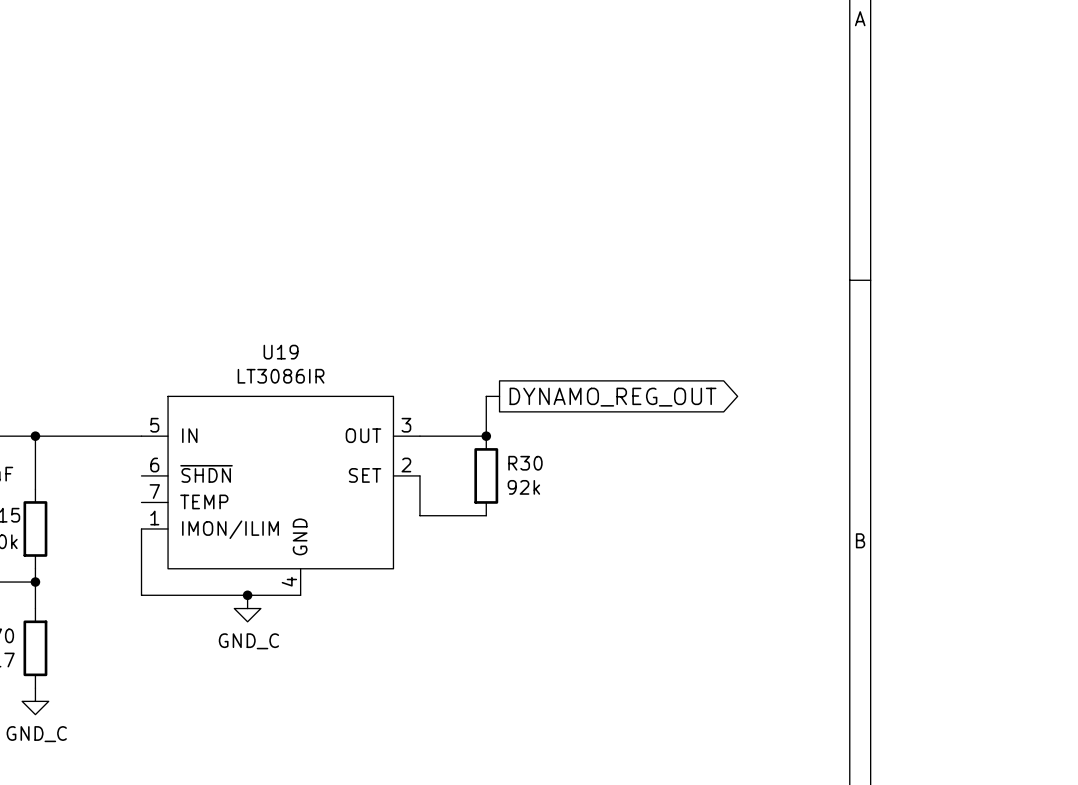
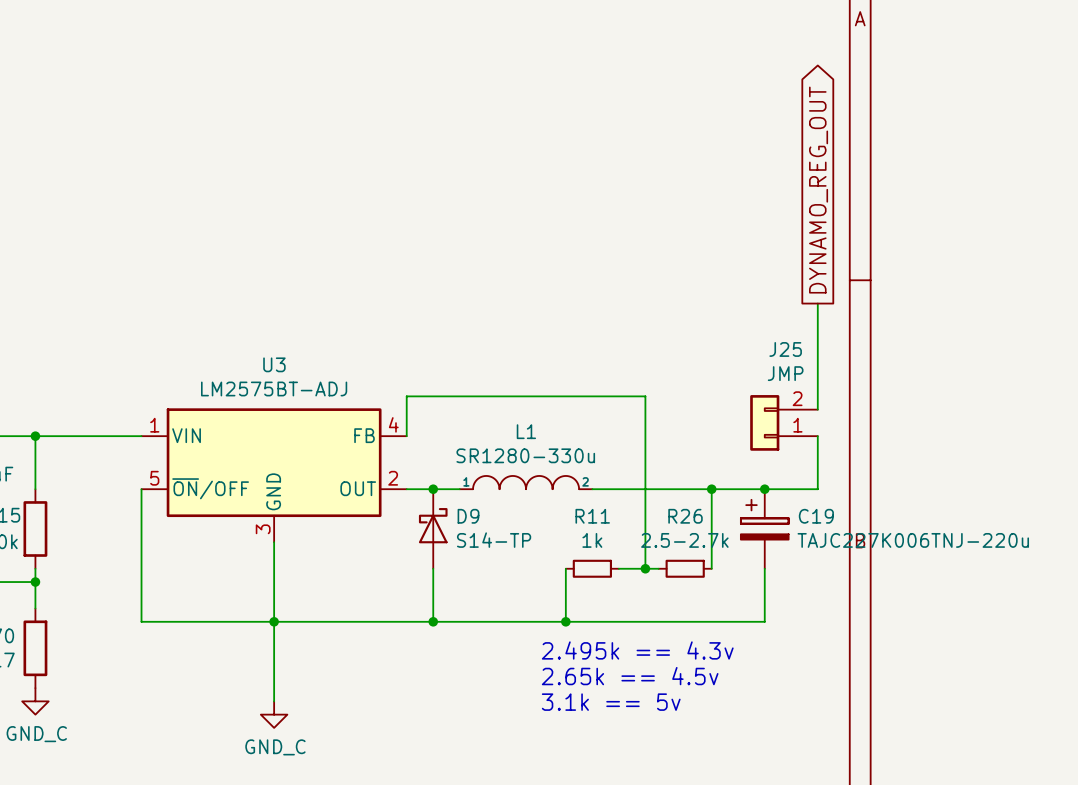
global label: none -> DYNAMO_REG_OUT (818, 190)
wire: none -> (817, 303) (817, 409)
wire: (486, 396) (486, 436) (419, 436) -> (486, 396) (406, 396) (406, 436)
wire: none -> (499, 396) (645, 396) (645, 568)
global label: DYNAMO_REG_OUT (613, 397) -> none
J25: none -> JMP (783, 422)
junction: (486, 436) -> none
wire: none -> (817, 436) (817, 489) (592, 489)
U3: none -> LM2575BT-ADJ (274, 475)
wire: (419, 475) (419, 515) (486, 515) -> none
R30: 92k (486, 475) -> none
L1: none -> SR1280-330u (526, 482)
wire: none -> (141, 489) (141, 528)
wire: none -> (406, 489) (459, 489)
junction: none -> (433, 489)
wire: none -> (711, 489) (711, 568)
junction: none -> (711, 489)
junction: none -> (764, 489)
U19: LT3086IR (280, 495) -> none
D9: none -> S14-TP (433, 528)
C19: none -> TAJC227K006TNJ-220u (764, 528)
wire: none -> (274, 542) (274, 701)
wire: none -> (433, 568) (433, 621)
wire: none -> (565, 568) (565, 621)
R11: none -> 1k (592, 568)
wire: none -> (618, 568) (658, 568)
junction: none -> (645, 568)
R26: none -> 2.5-2.7k (685, 568)
wire: (141, 595) (300, 595) -> (141, 595) (141, 621) (764, 621) (764, 568)
junction position: (247, 595) -> (274, 621)
power symbol position: GND_C (247, 608) -> GND_C (274, 714)
junction: none -> (433, 621)
junction: none -> (565, 621)
text: none -> 2.495k == 4.3v (637, 650)
text: none -> 2.65k == 4.5v (630, 676)
text: none -> 3.1k == 5v (611, 702)

